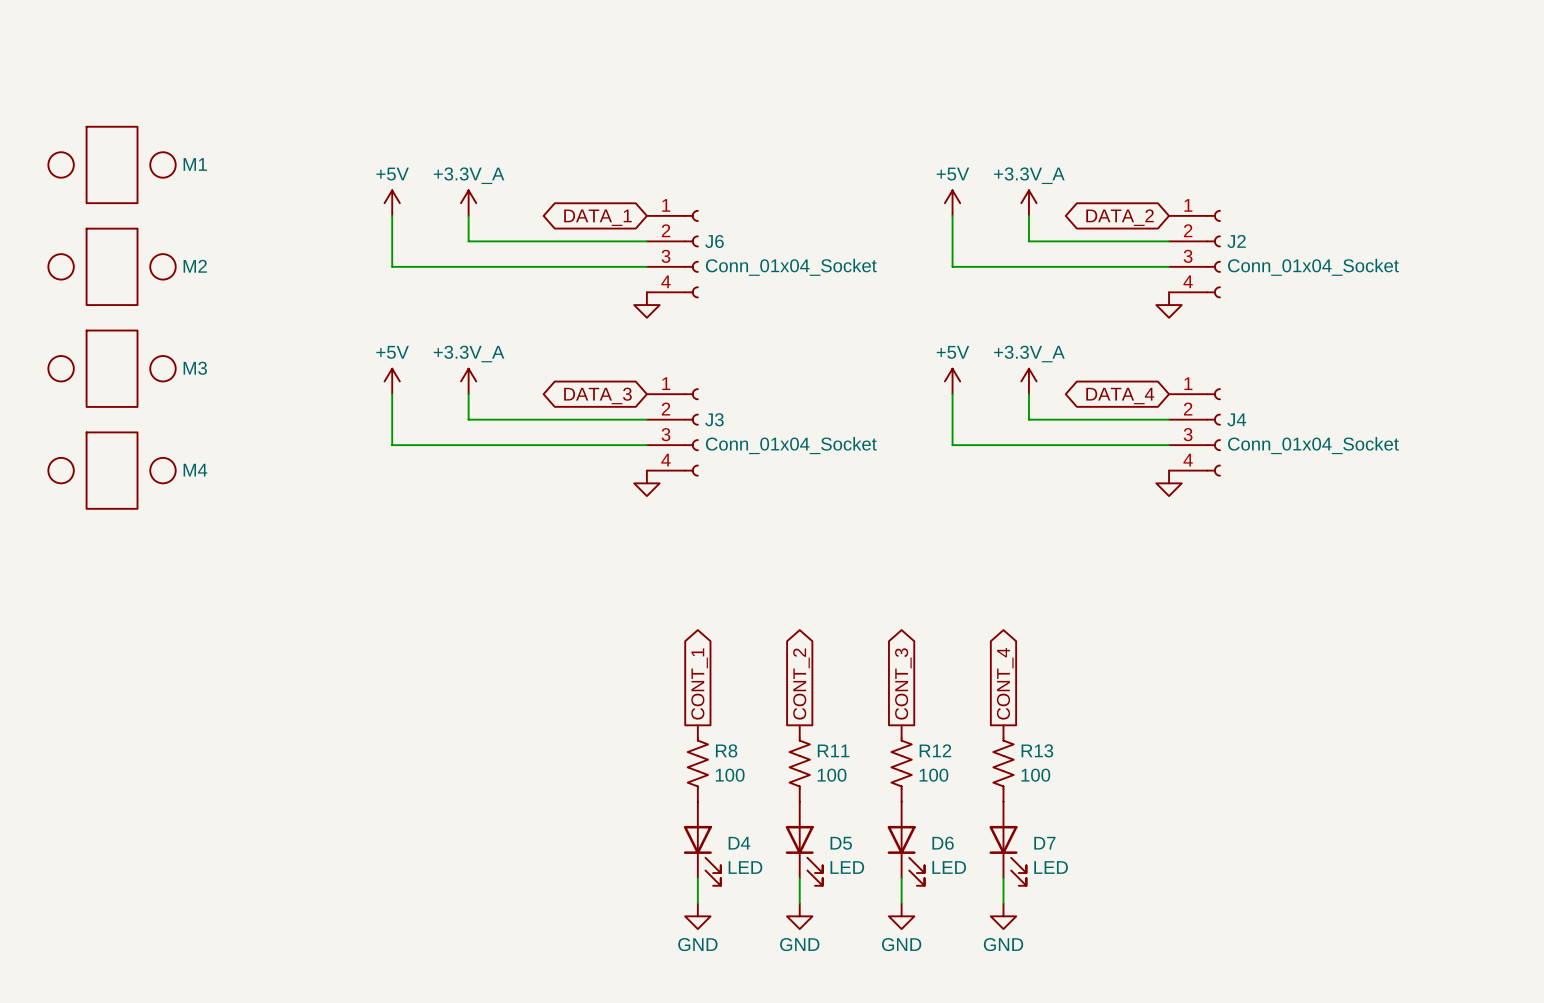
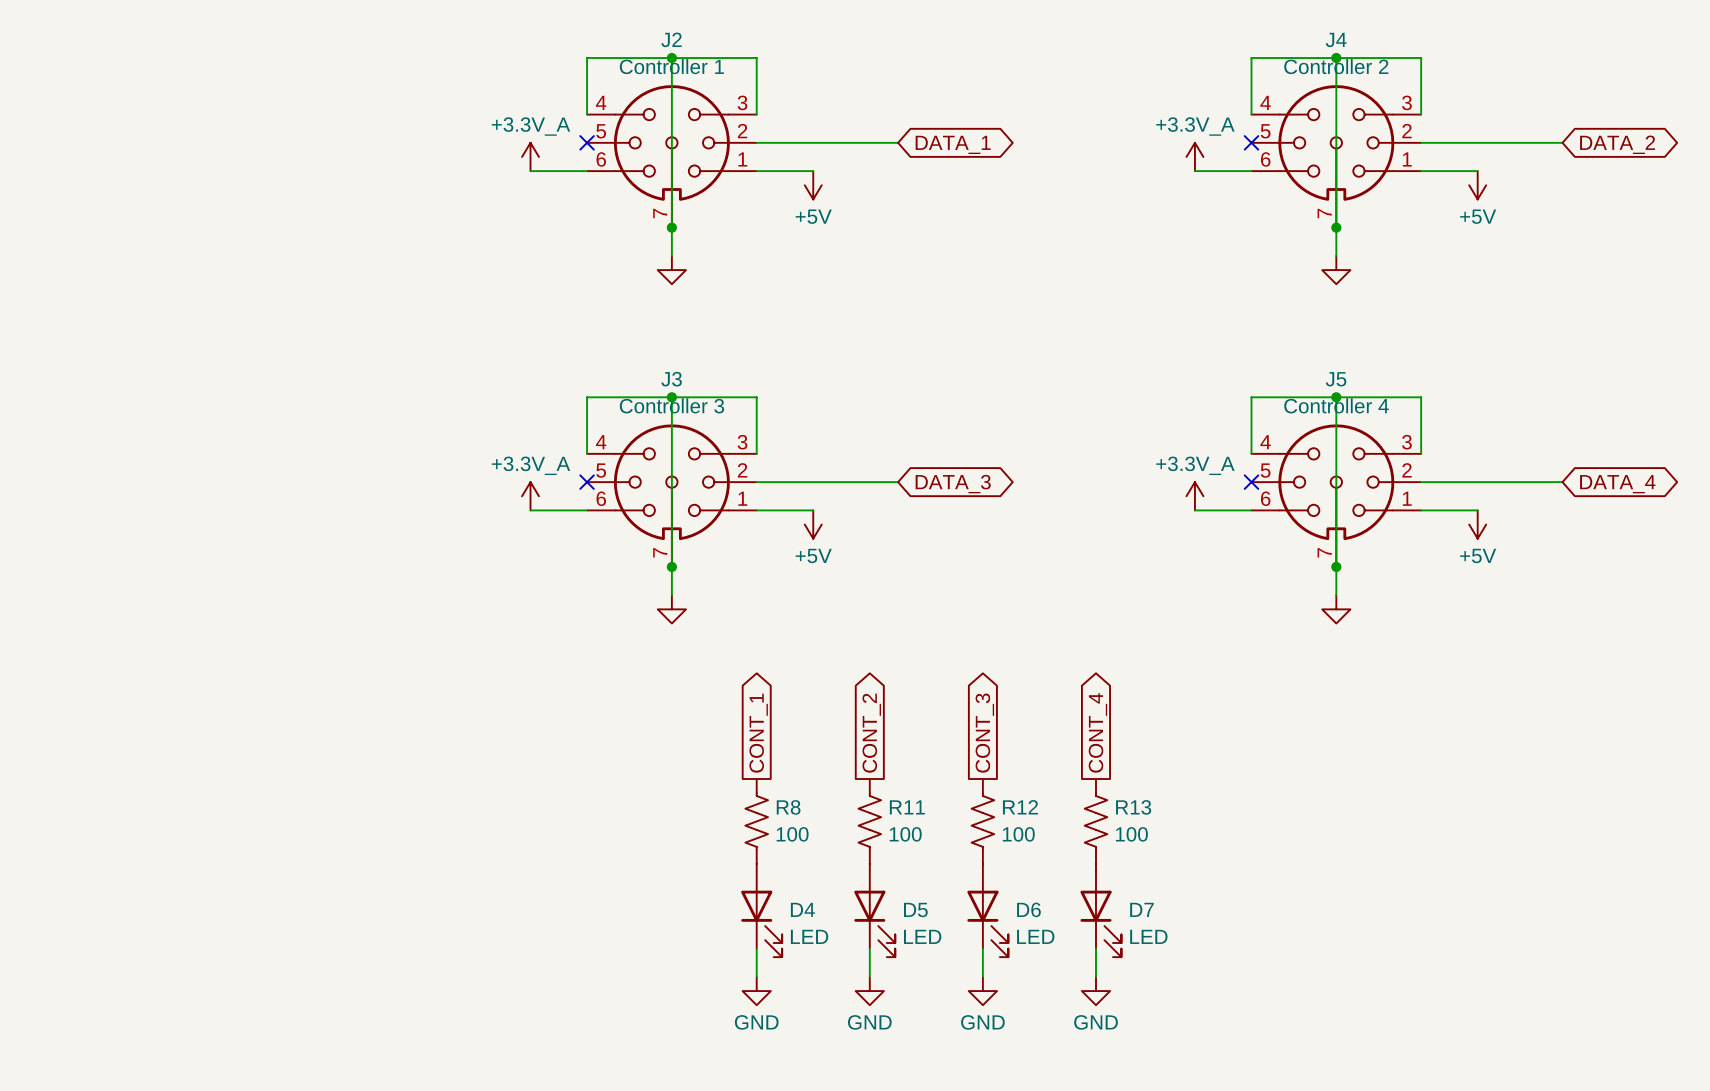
wire: none -> (671, 58) (671, 255)
junction: none -> (671, 58)
wire: none -> (1336, 58) (1336, 255)
junction: none -> (1336, 58)
wire: none -> (587, 114) (587, 58) (756, 58) (756, 114)
wire: none -> (1251, 114) (1251, 58) (1421, 58) (1421, 114)
no-connect mark: none -> (587, 142)
wire: none -> (756, 142) (898, 142)
no-connect mark: none -> (1251, 142)
wire: none -> (1421, 142) (1562, 142)
global label: none -> DATA_2 (1617, 144)
M1: (112, 164) -> none
wire: none -> (530, 171) (587, 171)
wire: none -> (756, 171) (813, 171)
wire: none -> (1194, 171) (1251, 171)
wire: none -> (1421, 171) (1477, 171)
power symbol: none -> +5V (813, 185)
power symbol: none -> +5V (1477, 185)
power symbol: +5V (392, 203) -> none
power symbol position: +3.3V_A (468, 203) -> +3.3V_A (530, 156)
power symbol: +5V (952, 203) -> none
power symbol position: +3.3V_A (1028, 203) -> +3.3V_A (1194, 156)
J2 symbol: [1169, 210, 1221, 299] -> [587, 85, 757, 228]
wire: (392, 215) (392, 266) (646, 266) -> none
wire: (468, 215) (468, 241) (646, 241) -> none
wire: (952, 215) (952, 266) (1169, 266) -> none
wire: (1028, 215) (1028, 241) (1169, 241) -> none
global label rotation: 0° (597, 217) -> 180° (953, 144)
global label position: DATA_1 (597, 217) -> DATA_1 (953, 144)
global label: DATA_2 (1120, 217) -> none
junction: none -> (671, 227)
junction: none -> (1336, 227)
J2 name position: J2 (1236, 241) -> J2 (671, 39)
J6: Conn_01x04_Socket (672, 254) -> none
M2: (112, 266) -> none
J2 value: Conn_01x04_Socket (1313, 267) -> Controller 1 (671, 66)
power symbol position: (646, 305) -> (671, 270)
power symbol position: (1169, 305) -> (1336, 270)
M3: (112, 368) -> none
power symbol: +5V (392, 381) -> none
power symbol position: +3.3V_A (468, 381) -> +3.3V_A (530, 496)
wire: none -> (671, 397) (671, 595)
junction: none -> (671, 397)
power symbol: +5V (952, 381) -> none
power symbol position: +3.3V_A (1028, 381) -> +3.3V_A (1194, 496)
wire: none -> (1336, 397) (1336, 595)
junction: none -> (1336, 397)
J3 symbol: [646, 388, 699, 477] -> [587, 424, 757, 567]
J4 symbol: [1169, 388, 1221, 477] -> [1251, 85, 1422, 228]
wire: (392, 394) (392, 445) (646, 445) -> none
wire: (468, 394) (468, 419) (646, 419) -> none
wire: (952, 394) (952, 445) (1169, 445) -> none
wire: (1028, 394) (1028, 419) (1169, 419) -> none
global label rotation: 0° (597, 395) -> 180° (953, 484)
global label position: DATA_3 (597, 395) -> DATA_3 (953, 484)
global label: DATA_4 (1120, 396) -> none
J3 name position: J3 (714, 419) -> J3 (671, 379)
J4 name position: J4 (1236, 419) -> J4 (1336, 39)
wire: none -> (587, 453) (587, 397) (756, 397) (756, 453)
wire: none -> (1251, 453) (1251, 397) (1421, 397) (1421, 453)
J3 value: Conn_01x04_Socket (791, 445) -> Controller 3 (671, 405)
J4 value: Conn_01x04_Socket (1313, 445) -> Controller 2 (1336, 66)
no-connect mark: none -> (587, 482)
wire: none -> (756, 482) (898, 482)
no-connect mark: none -> (1251, 482)
wire: none -> (1421, 482) (1562, 482)
global label: none -> DATA_4 (1617, 484)
M4: (112, 470) -> none
J5: none -> Controller 4 (1336, 495)
wire: none -> (530, 510) (587, 510)
power symbol position: (646, 483) -> (671, 609)
wire: none -> (756, 510) (813, 510)
wire: none -> (1194, 510) (1251, 510)
power symbol position: (1169, 483) -> (1336, 609)
wire: none -> (1421, 510) (1477, 510)
power symbol: none -> +5V (813, 524)
power symbol: none -> +5V (1477, 524)
junction: none -> (671, 566)
junction: none -> (1336, 566)

